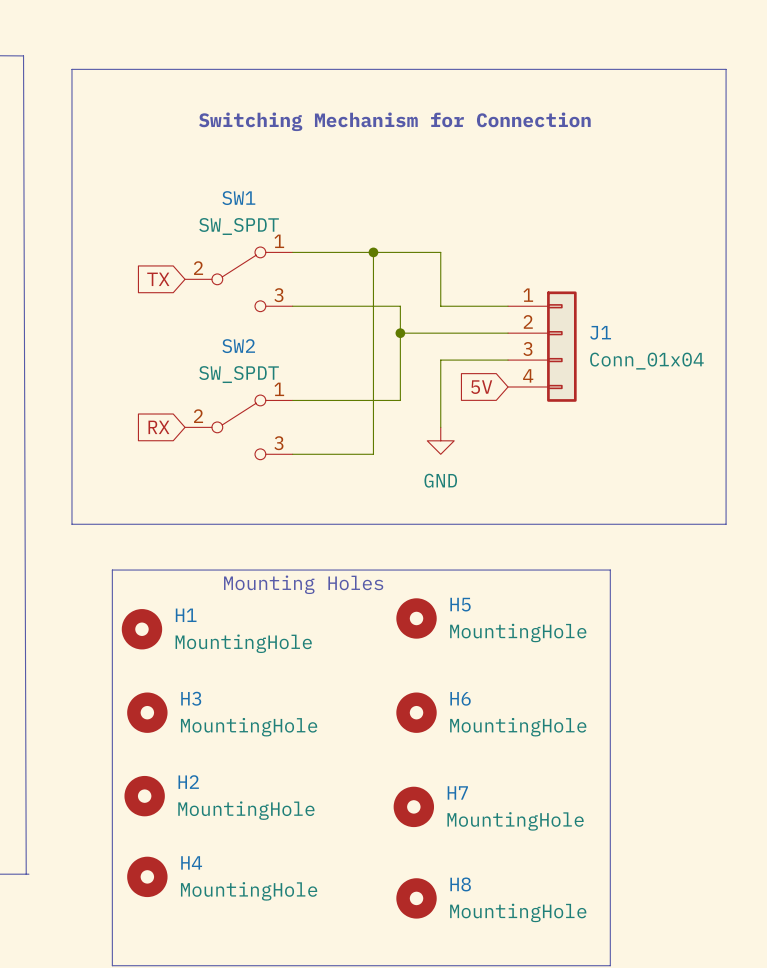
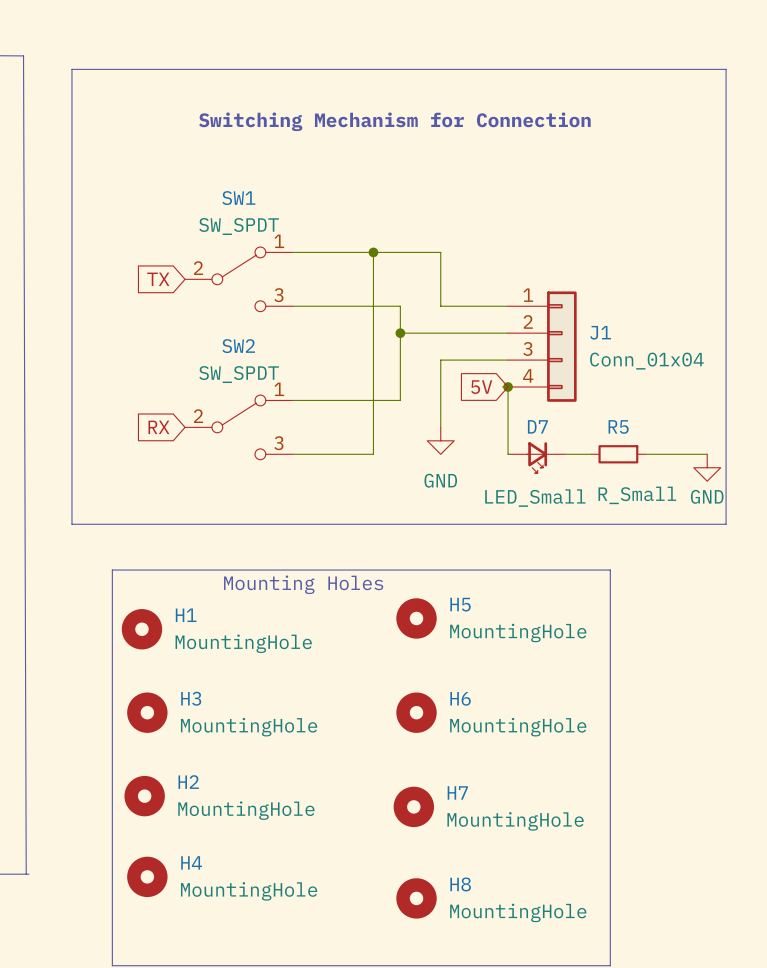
wire: none -> (502, 386) (508, 386) (508, 454) (510, 454)
junction: none -> (508, 386)
wire: none -> (564, 454) (591, 454)
R5: none -> R_Small (618, 454)
wire: none -> (645, 454) (707, 454)
D7: none -> LED_Small (537, 457)
power symbol: none -> GND (707, 467)

